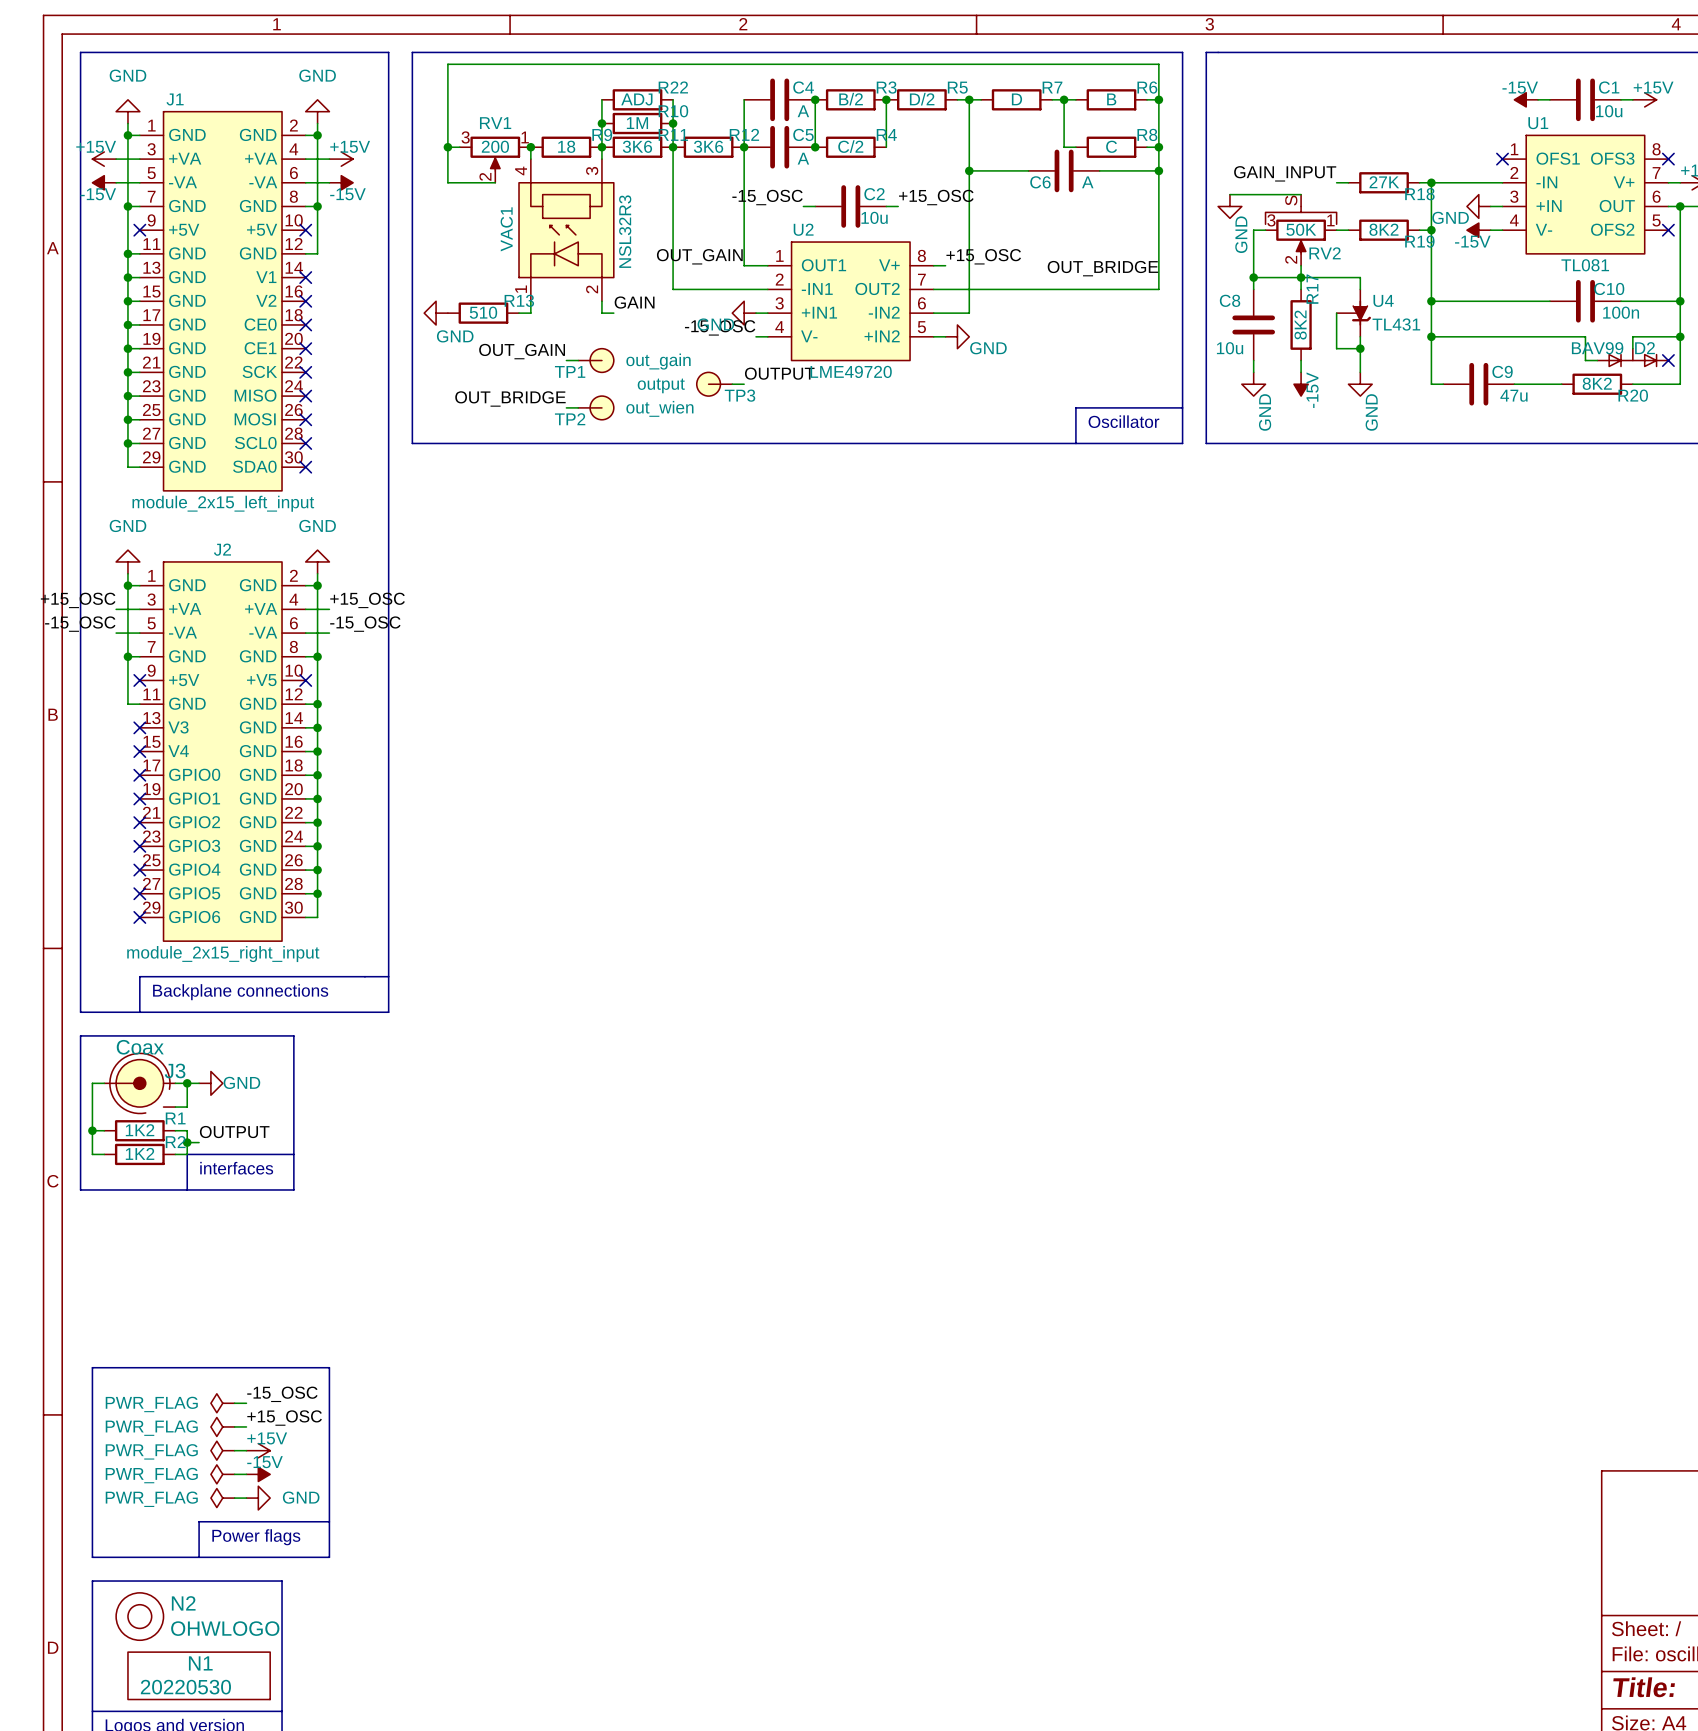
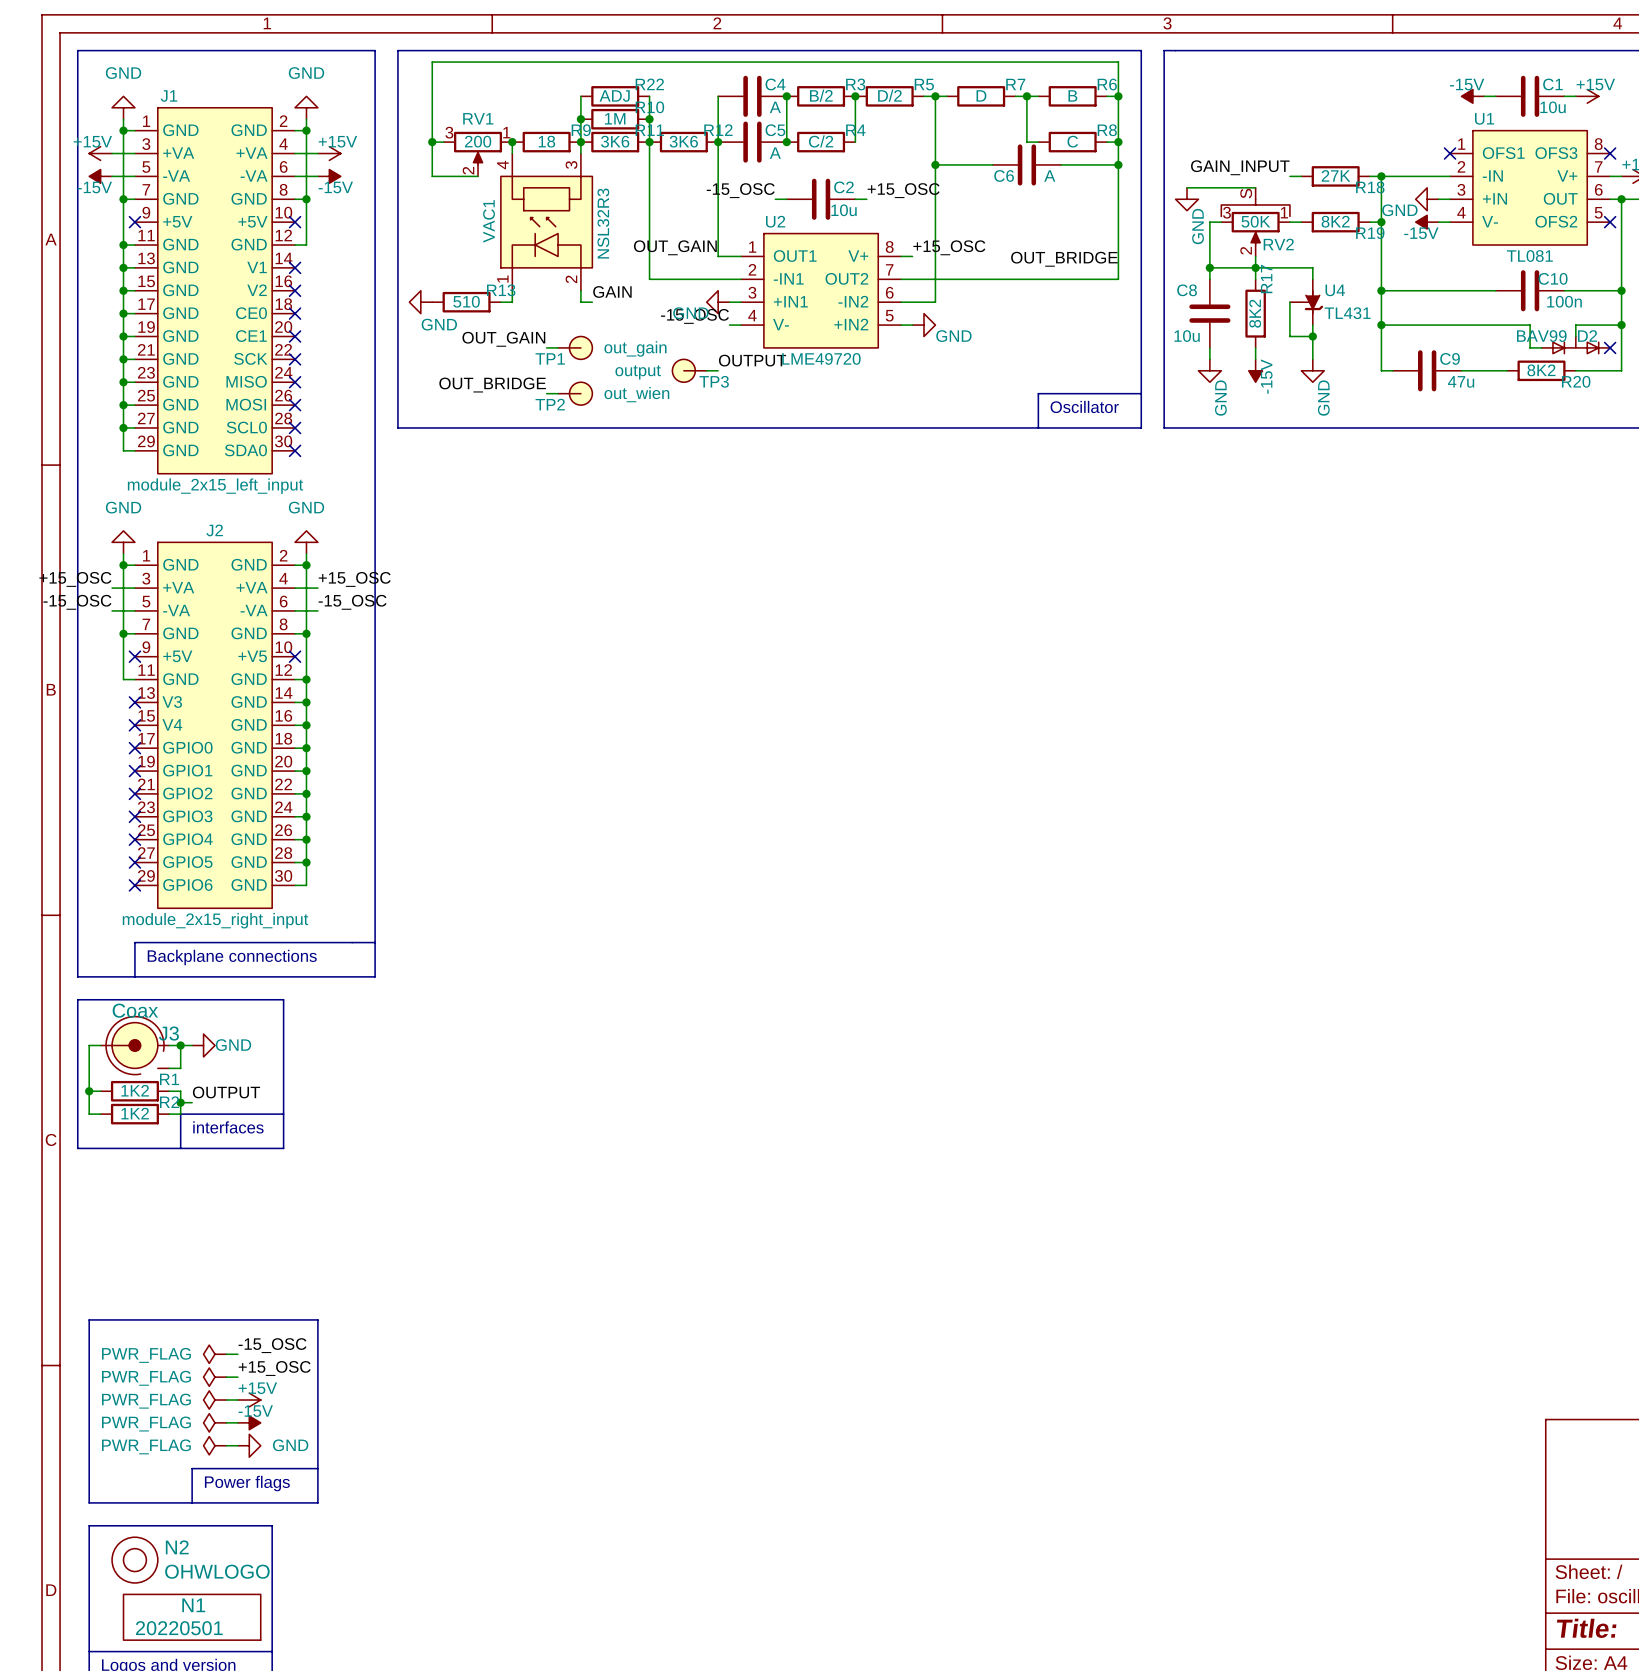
N1 value: 20220530 (185, 1687) -> 20220501 (179, 1628)

